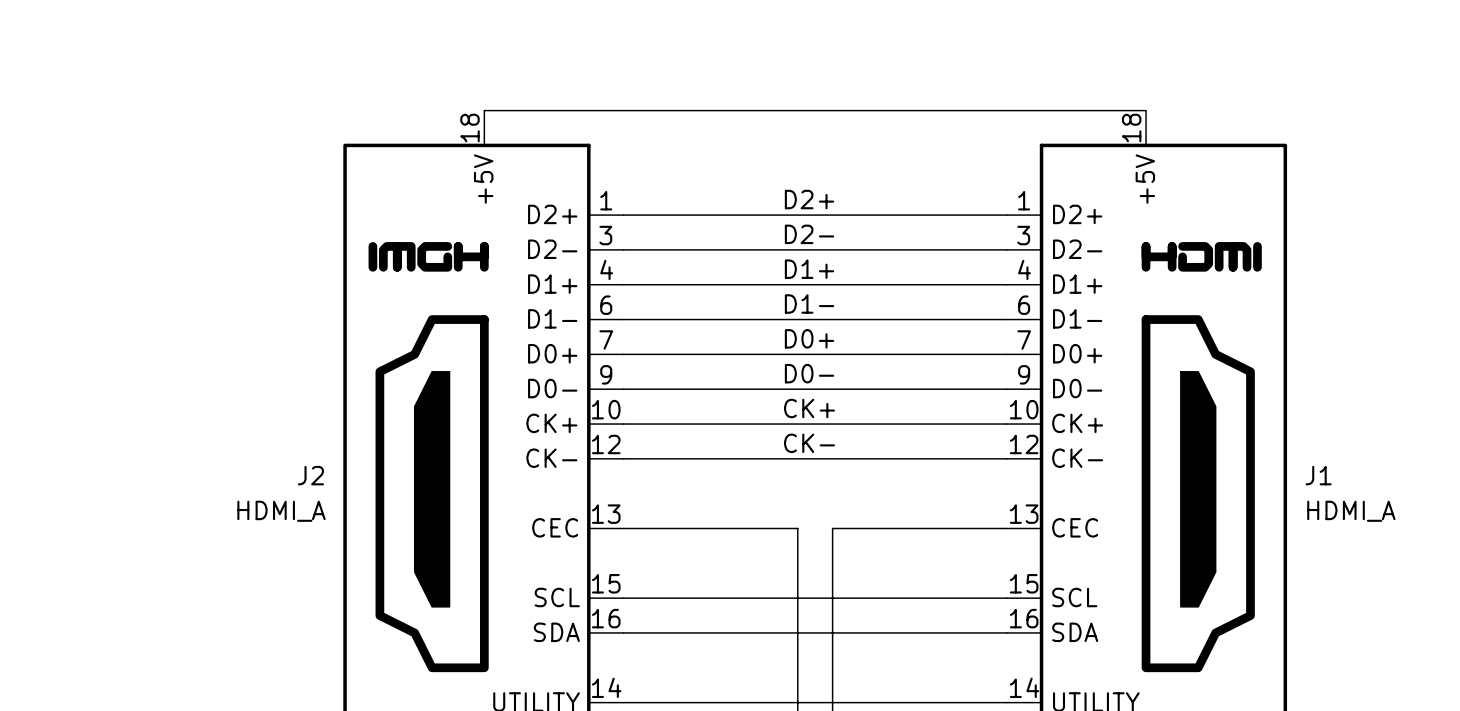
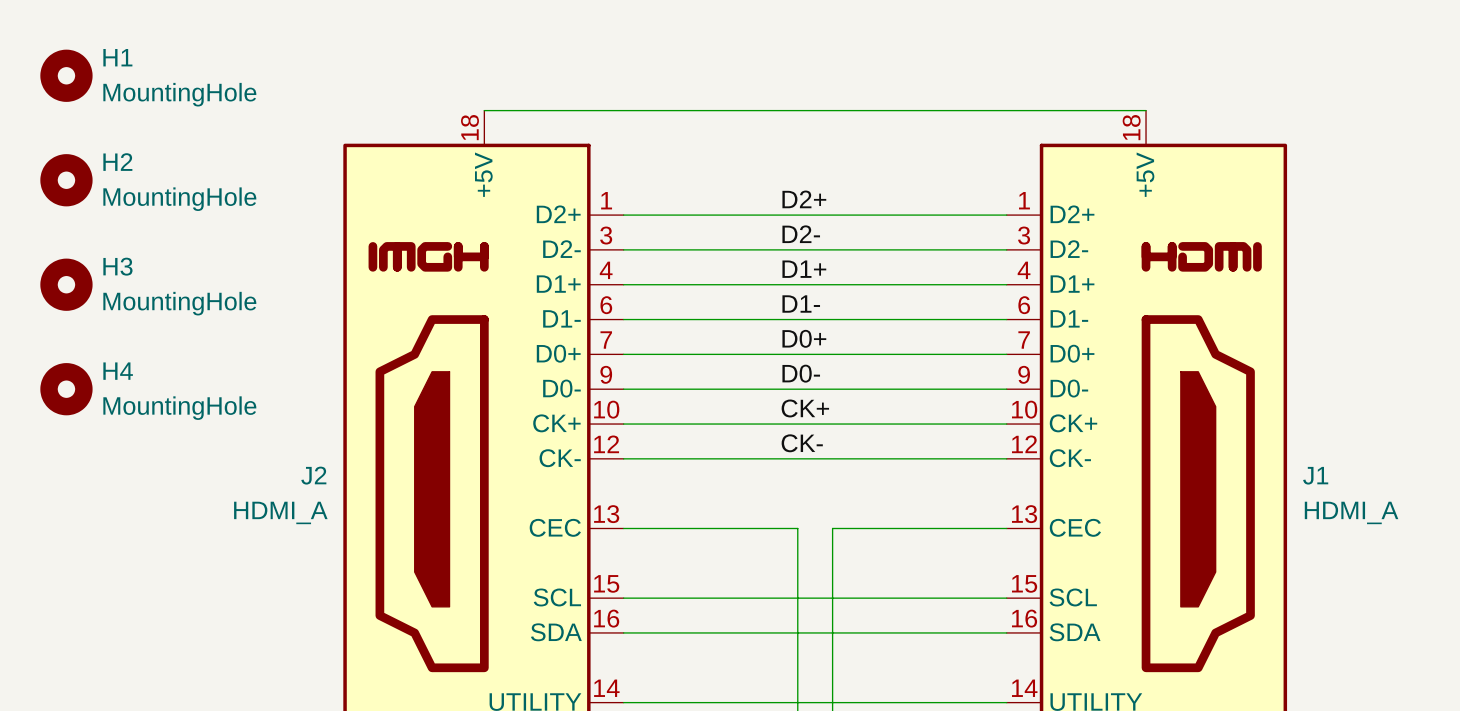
H1: none -> MountingHole (66, 75)
H2: none -> MountingHole (66, 180)
H3: none -> MountingHole (66, 284)
H4: none -> MountingHole (66, 389)

